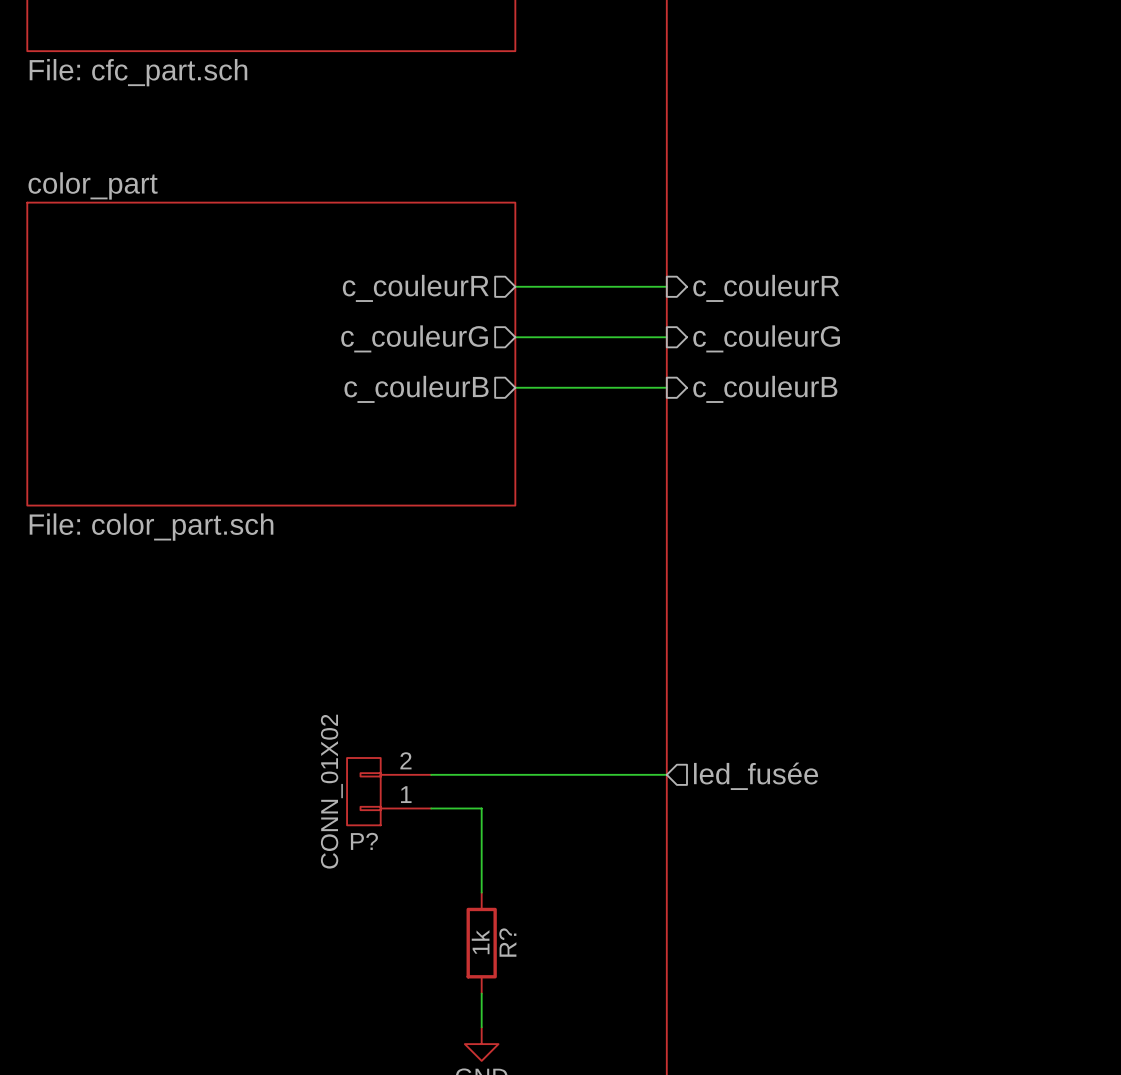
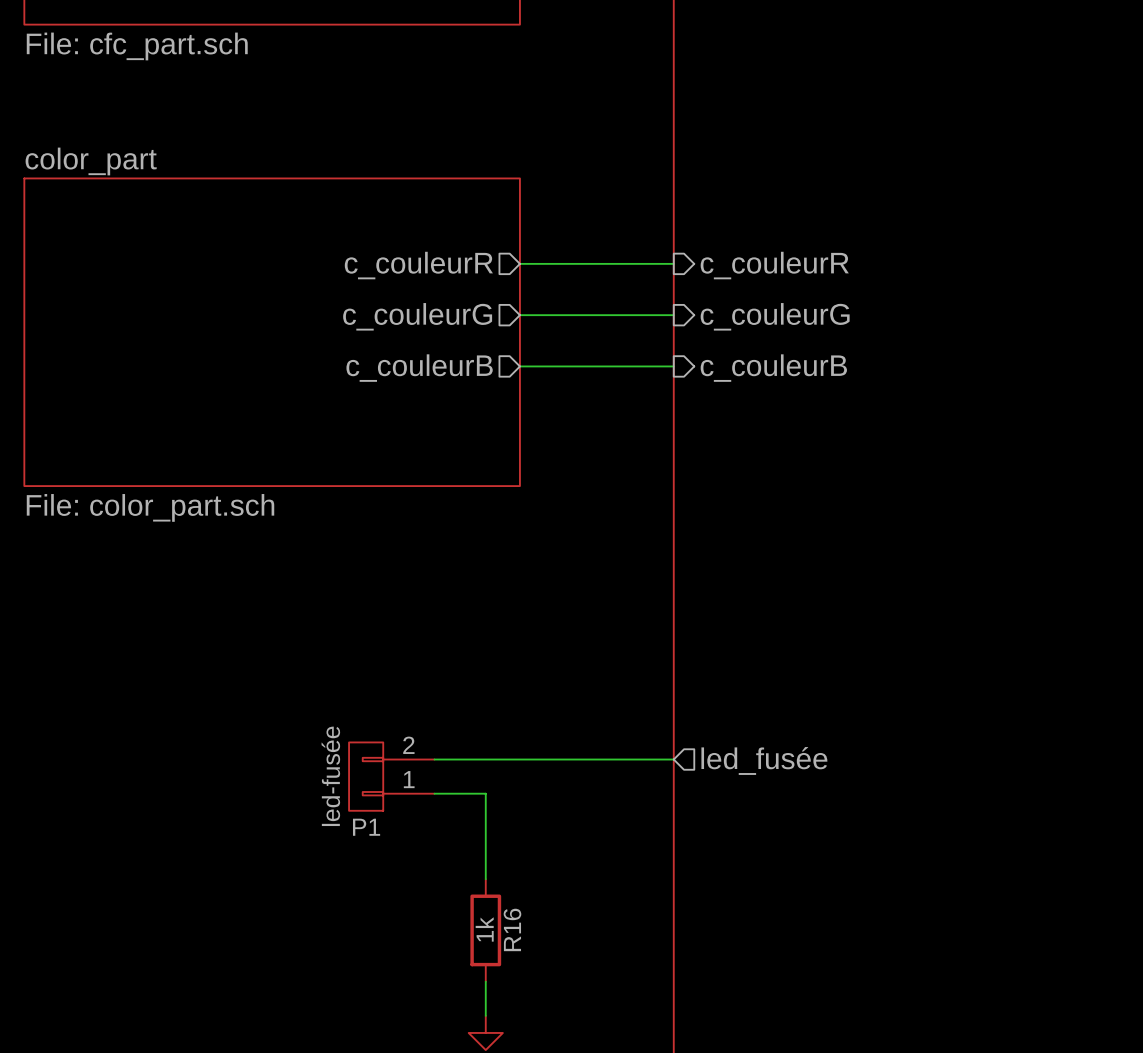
P? value: CONN_01X02 (331, 791) -> led-fusée (330, 776)
P? name: P? (364, 841) -> P1 (366, 827)
R? name: R? (507, 942) -> R16 (512, 929)

